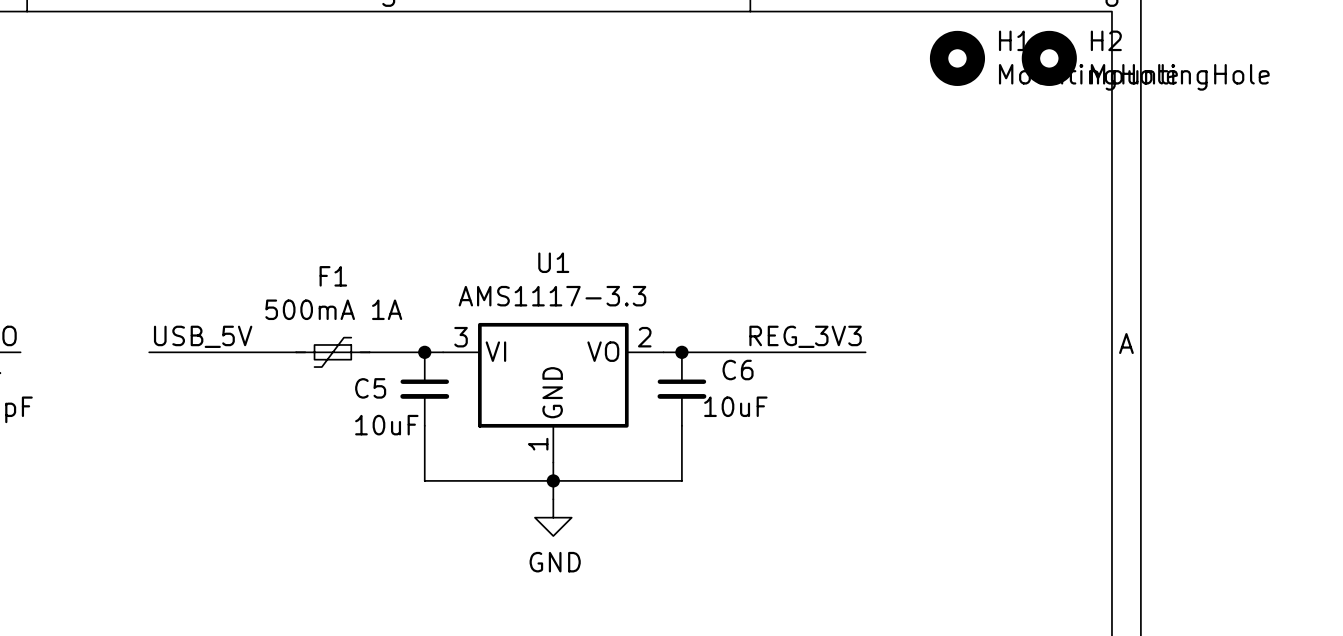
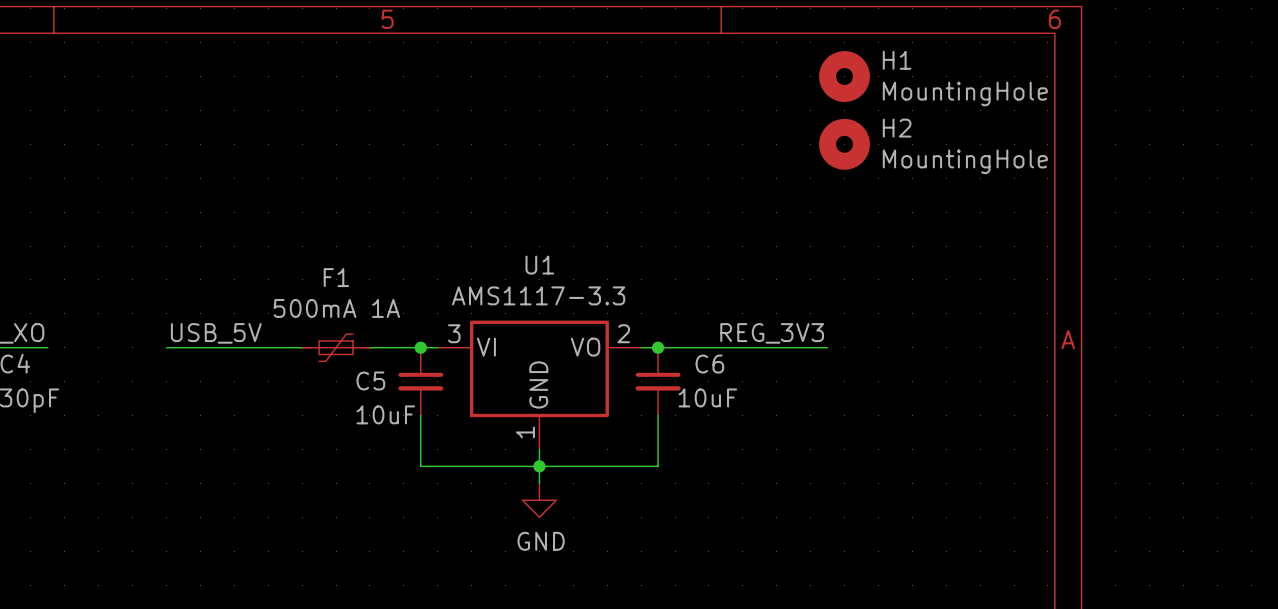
H1 position: (957, 58) -> (844, 76)
H2 position: (1049, 58) -> (844, 144)

